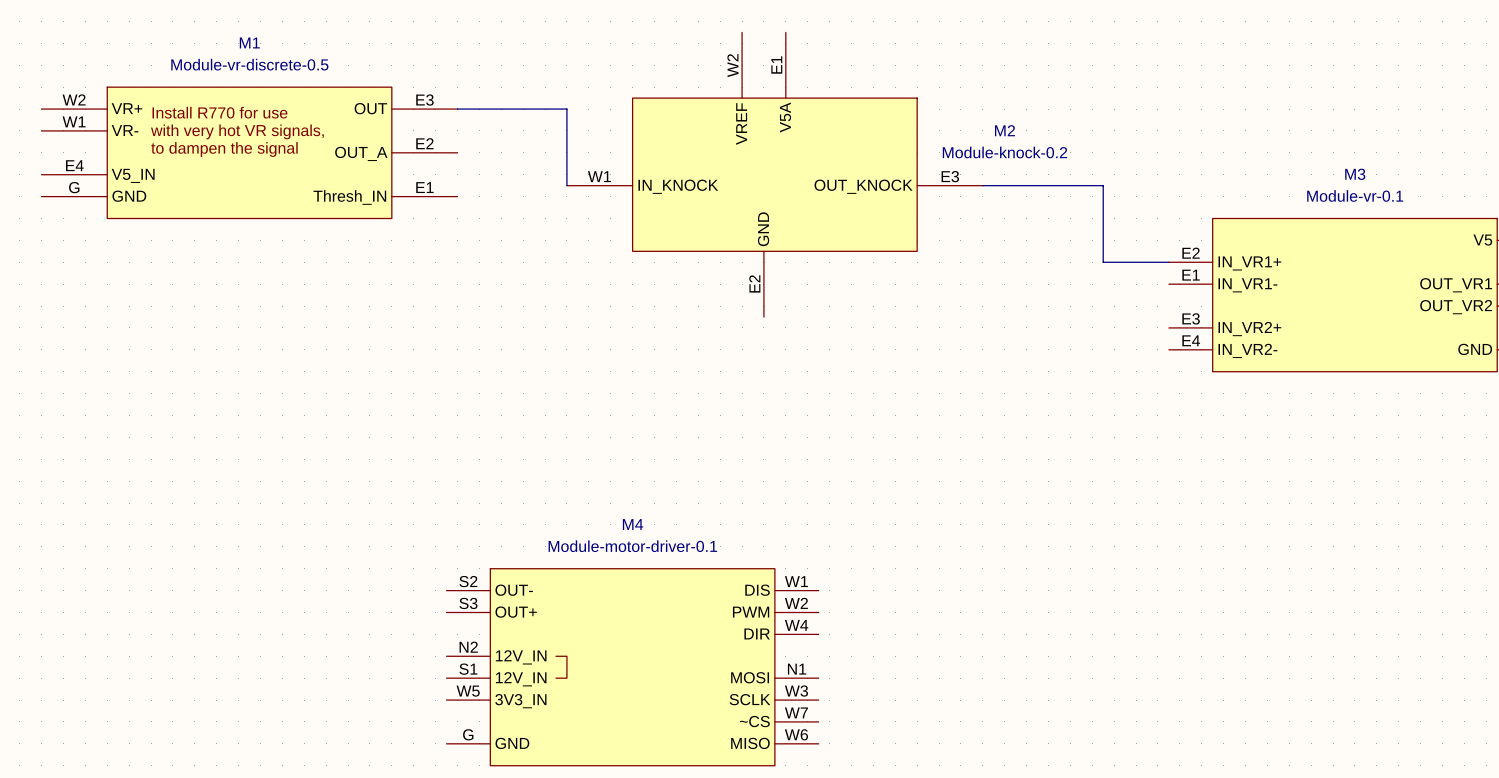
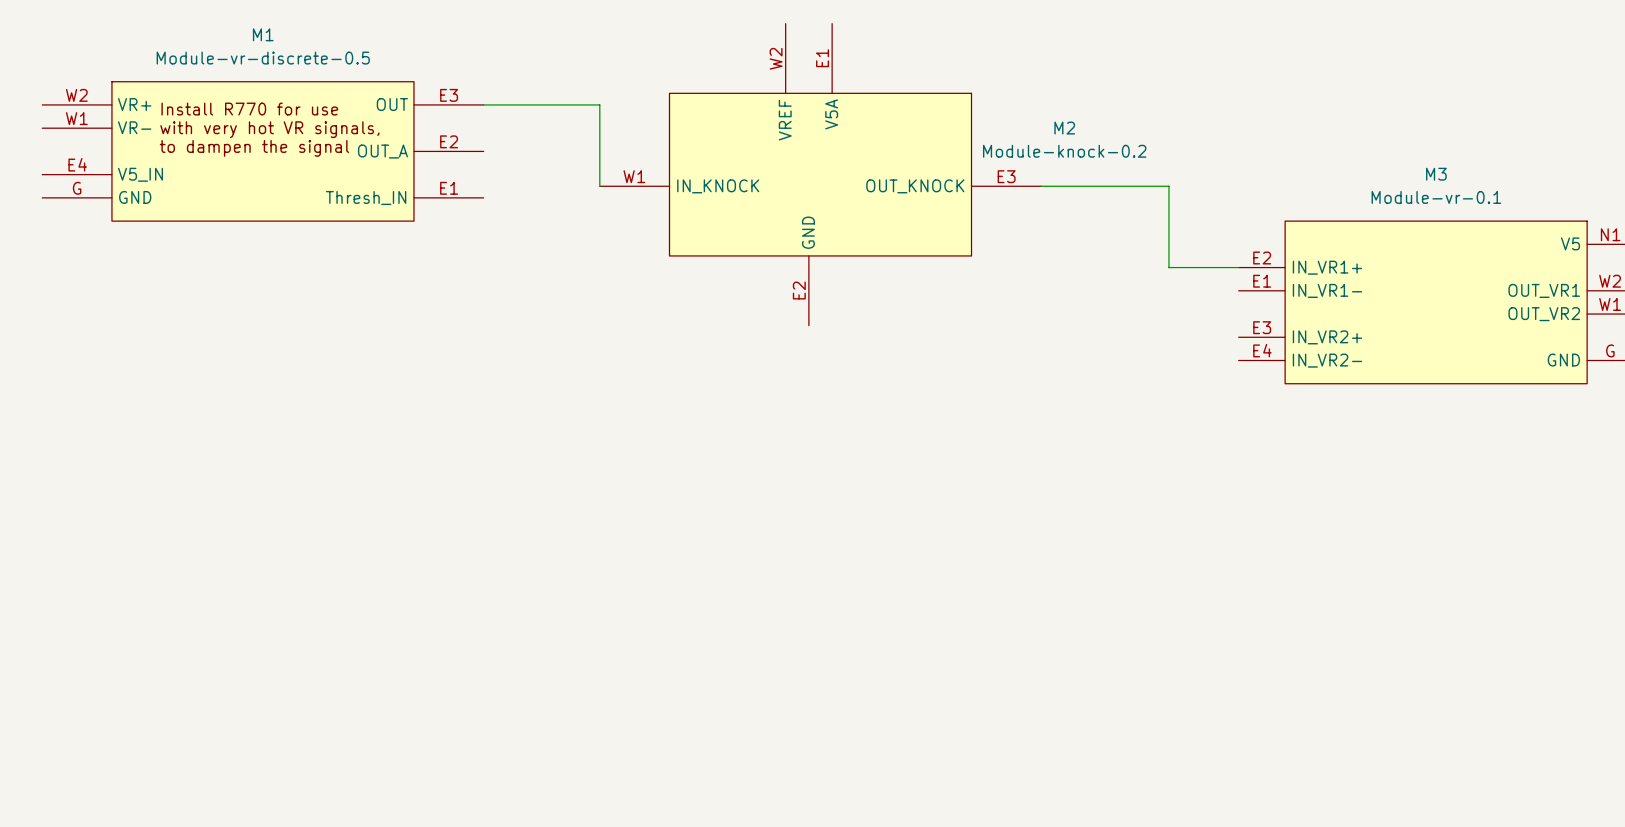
M4: Module-motor-driver-0.1 (632, 667) -> none

